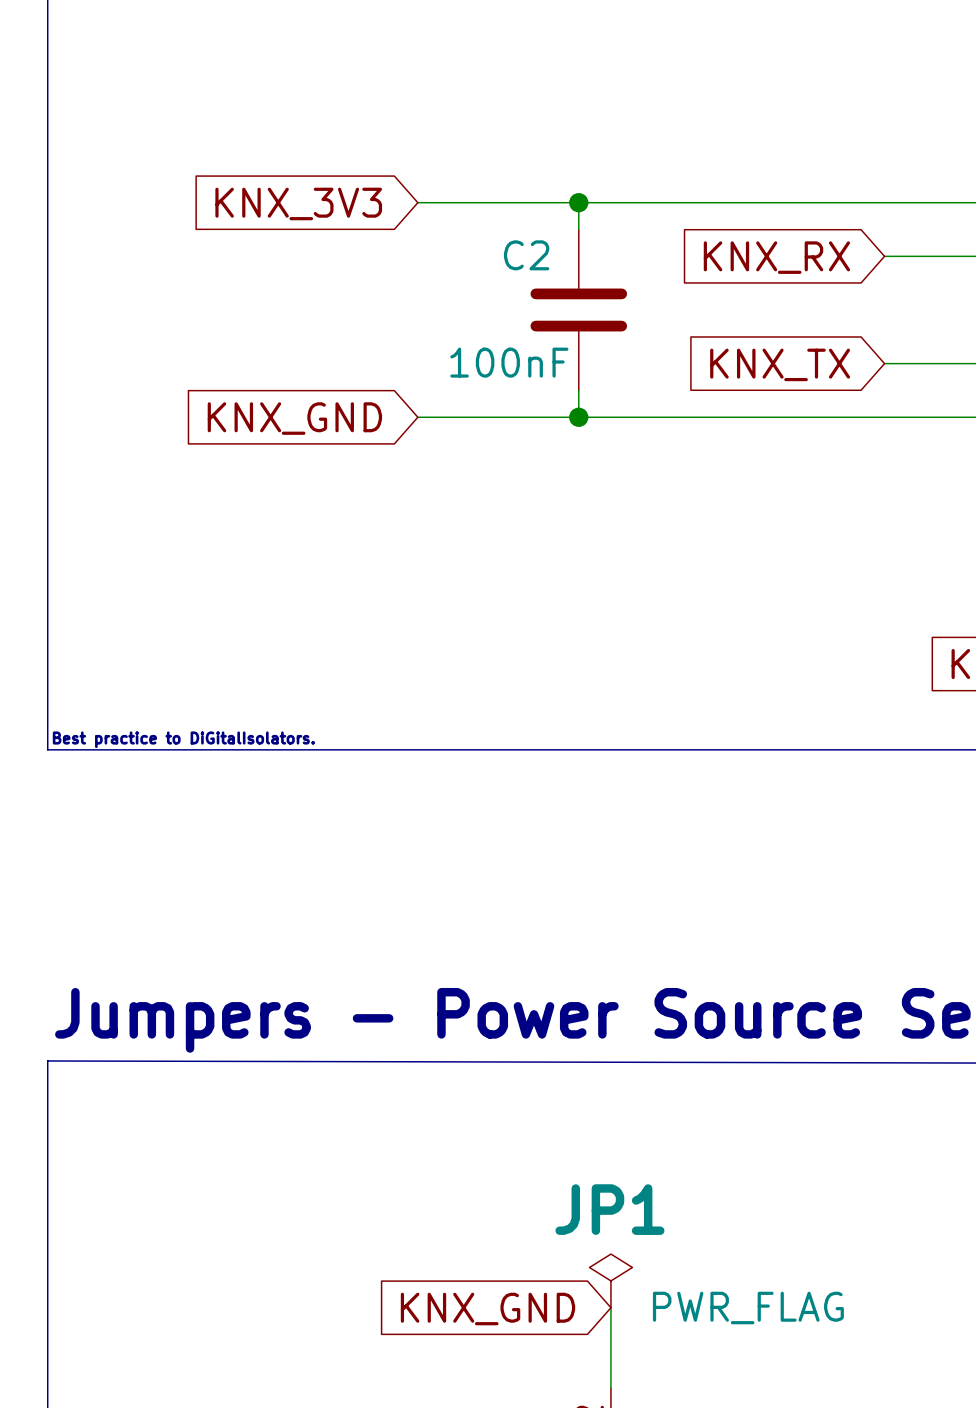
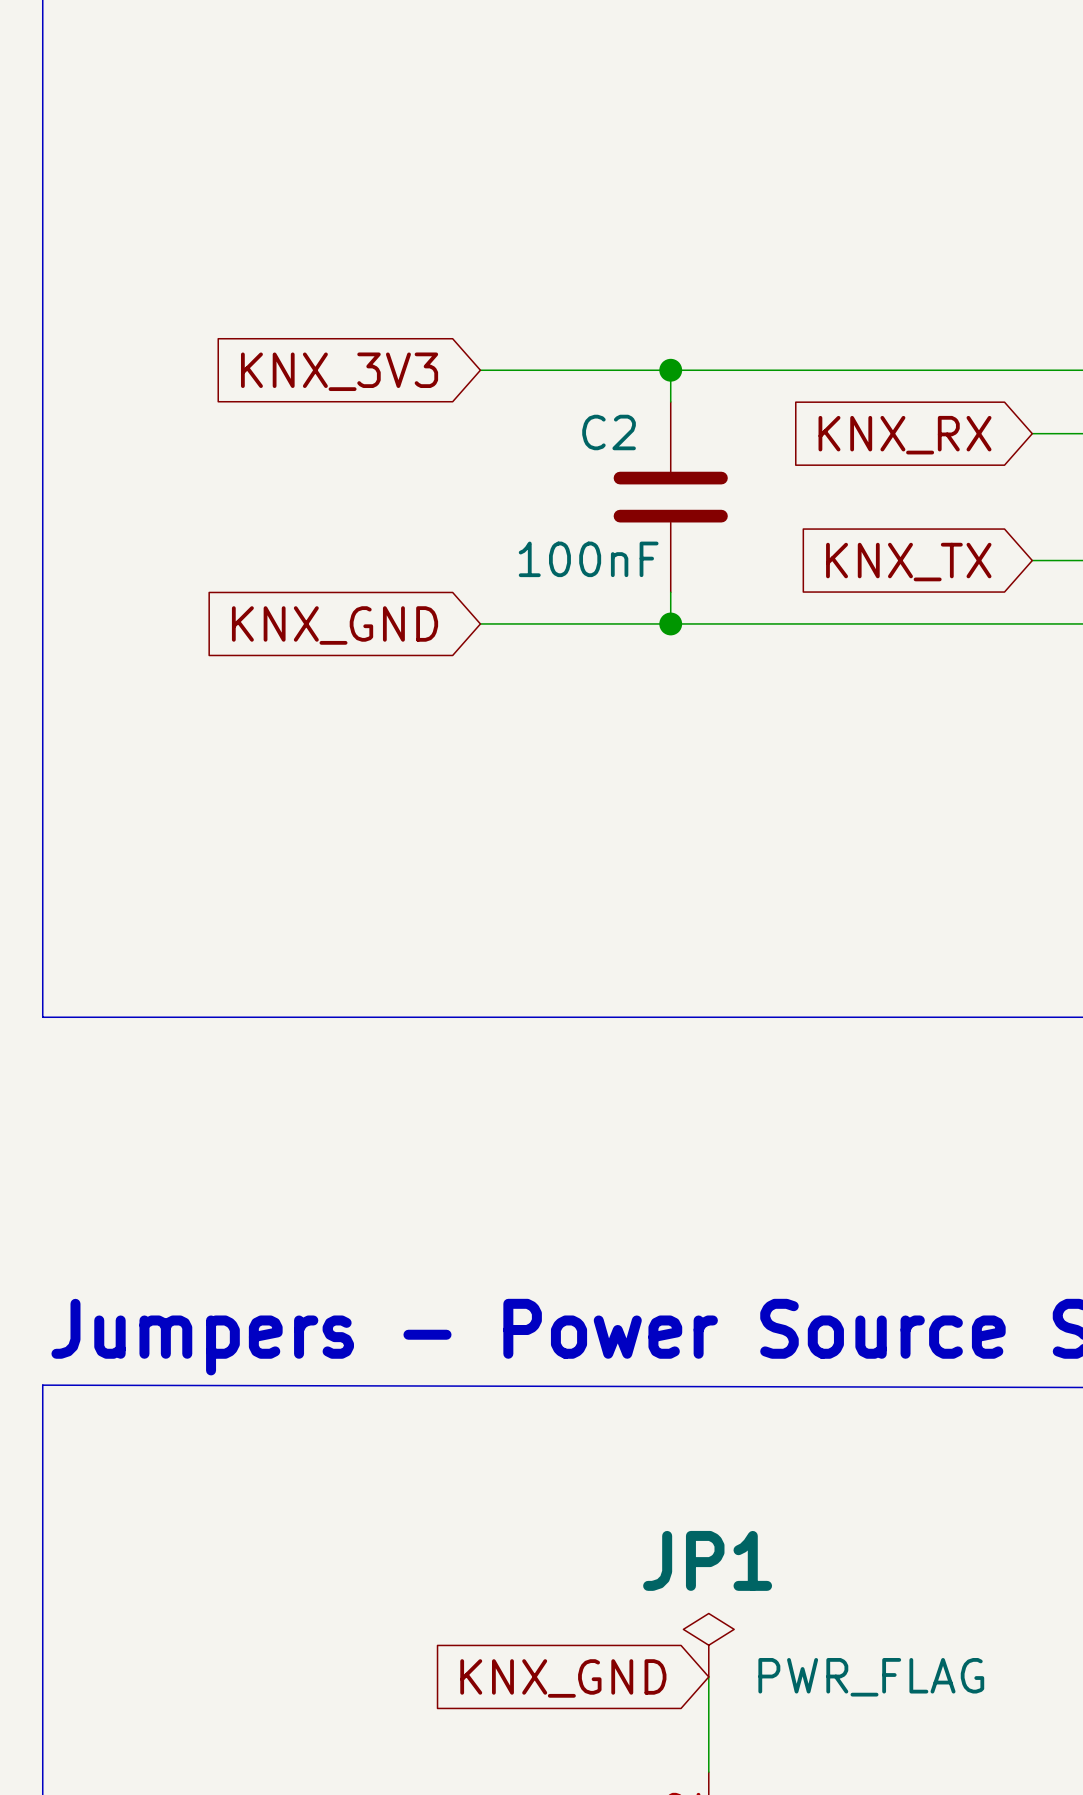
text: Best practice to DiGitalIsolators. (183, 739) -> none

